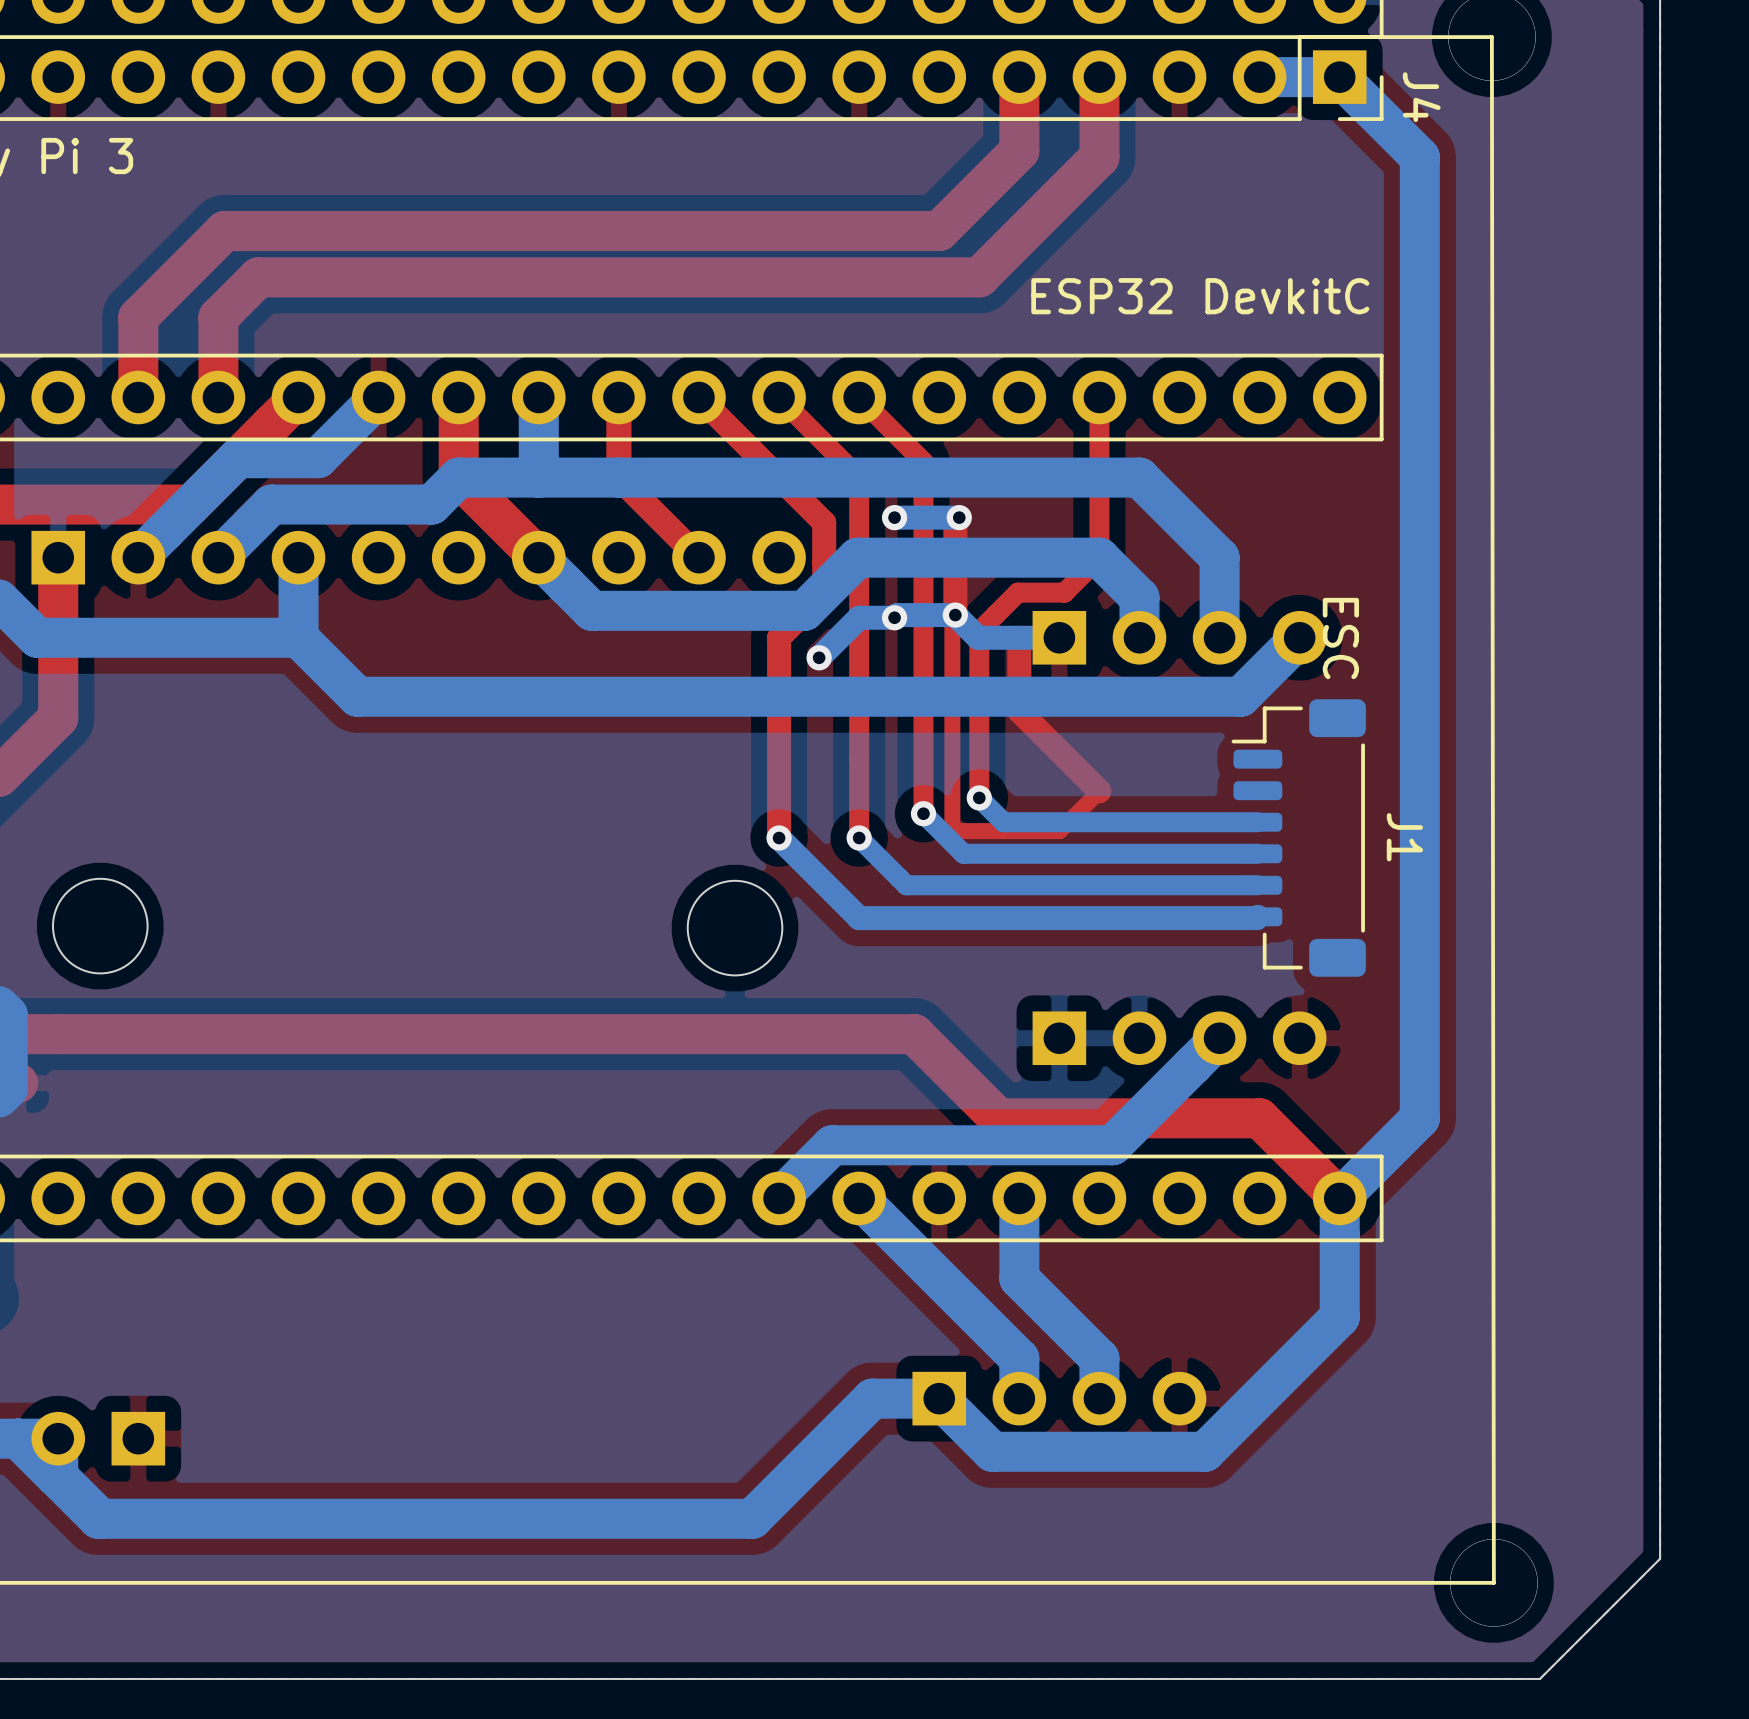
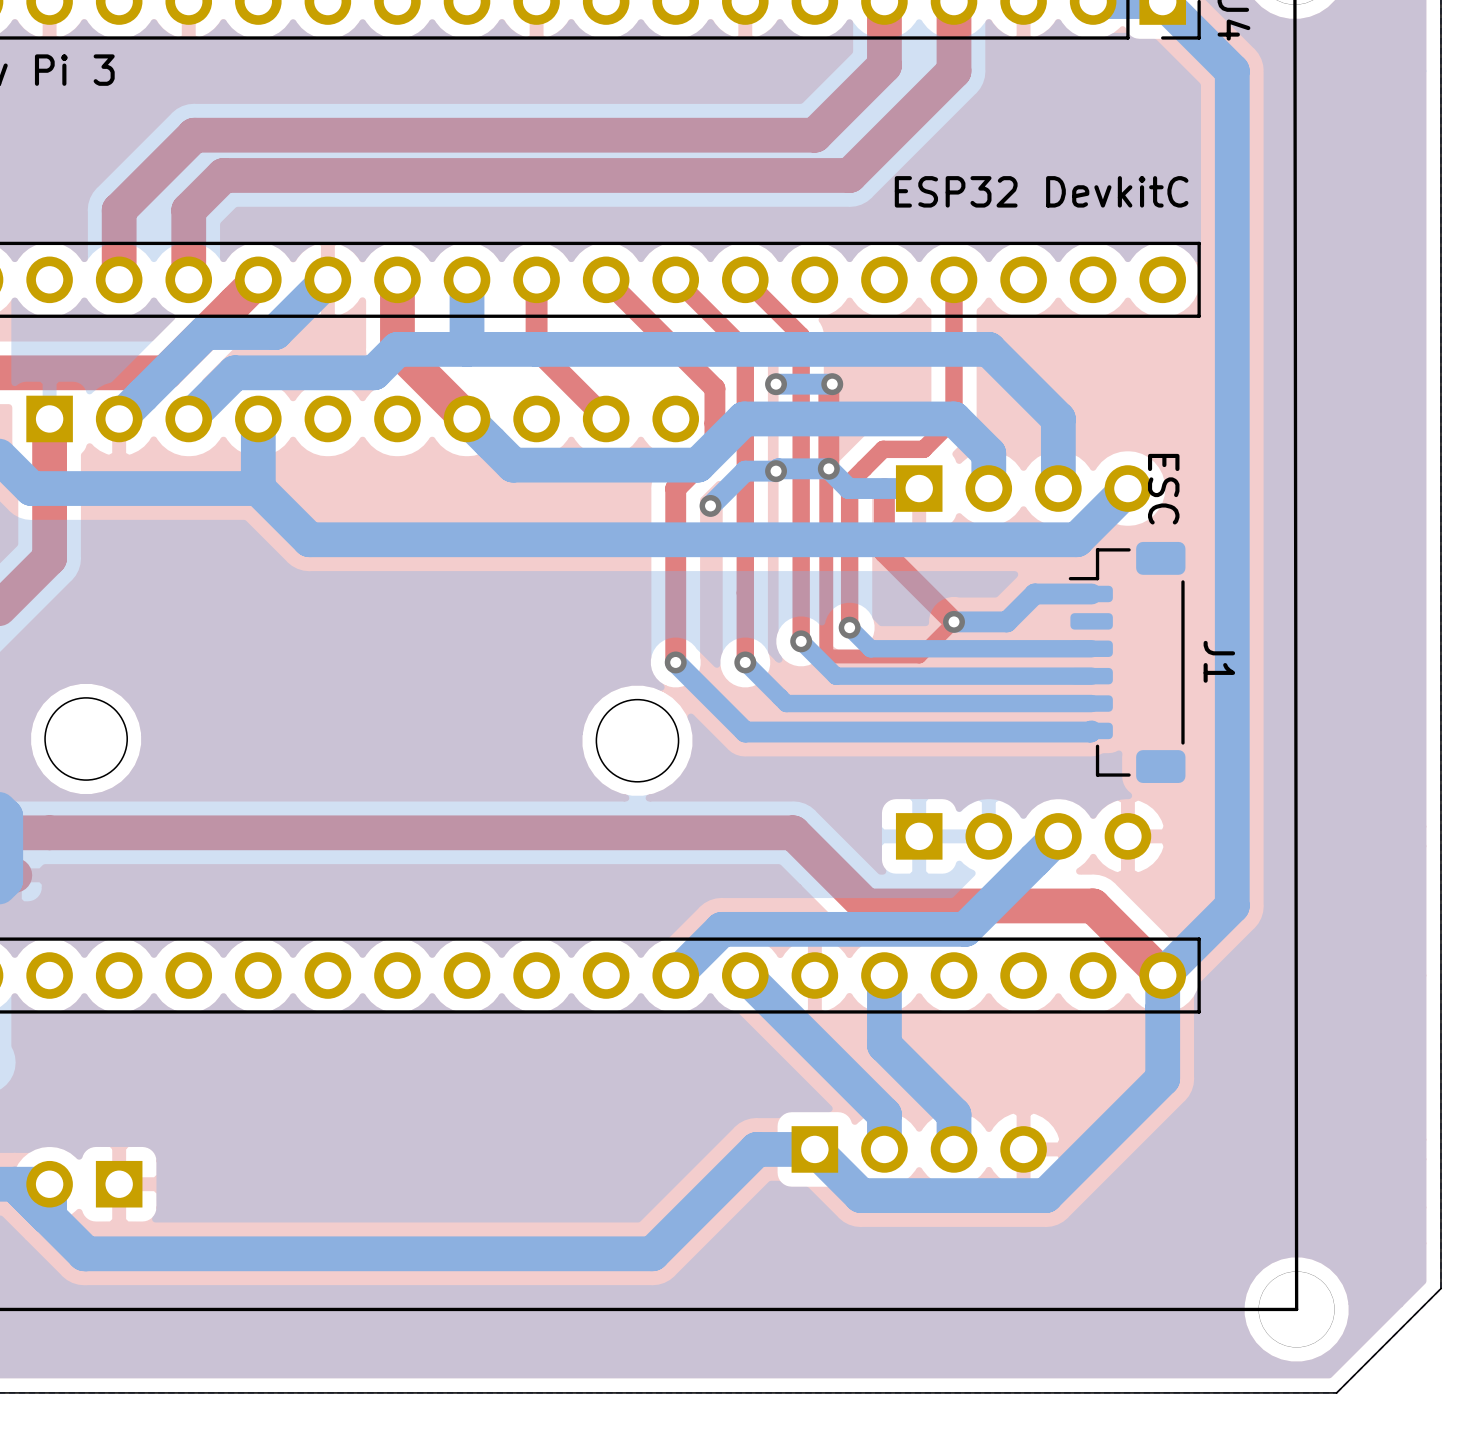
bottom track: none -> (1091, 593) (1034, 593) (1006, 621) (954, 621)
via: none -> (954, 621)

